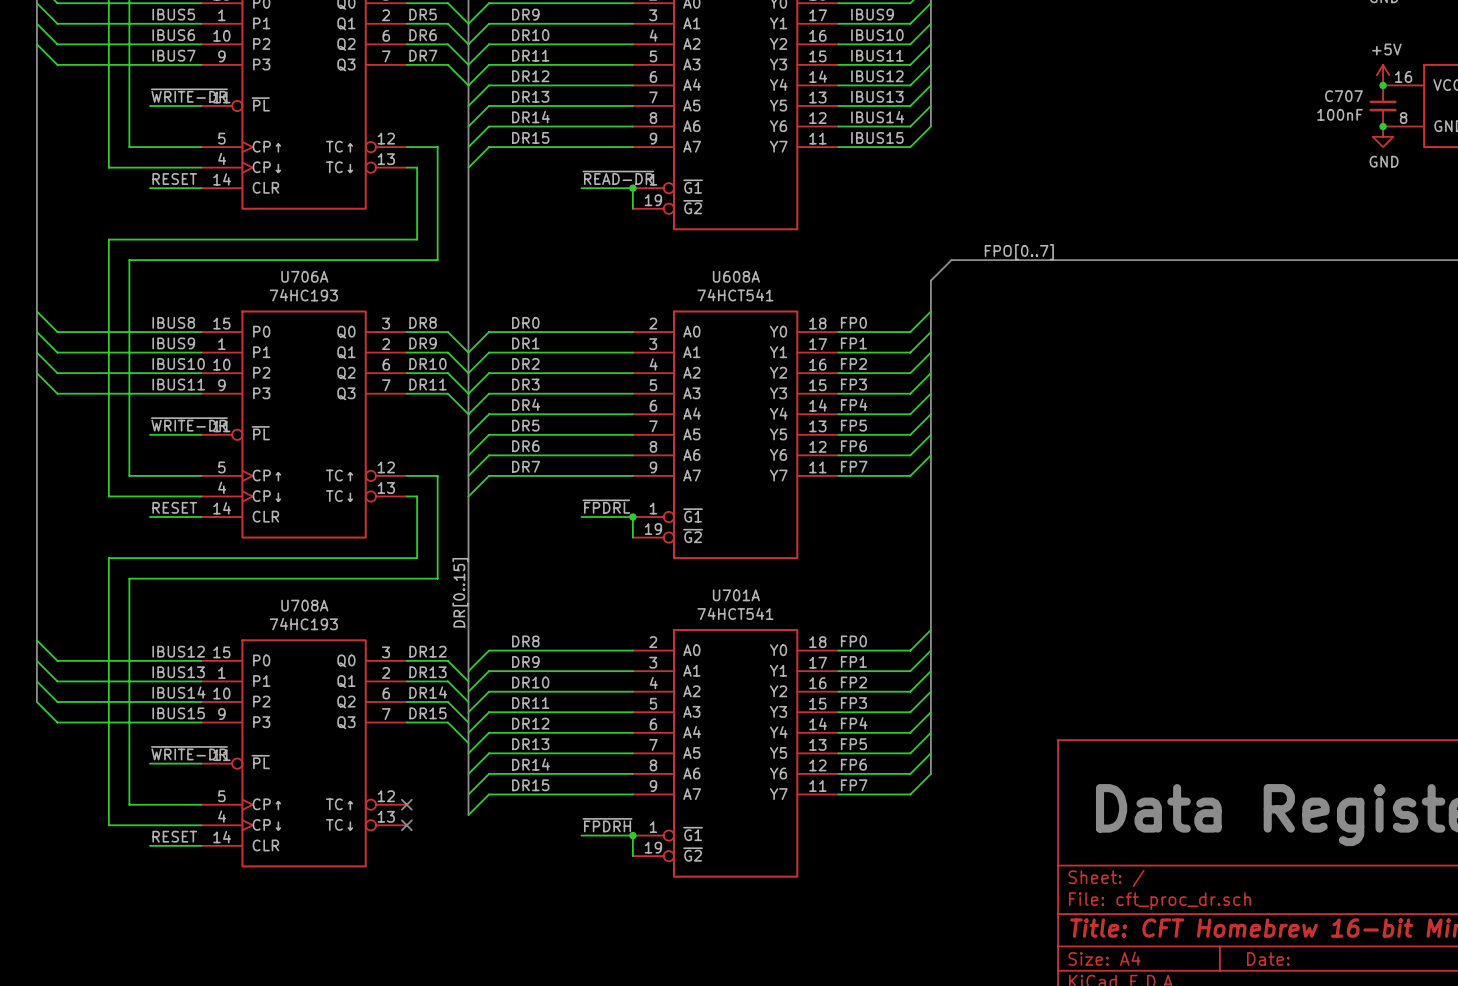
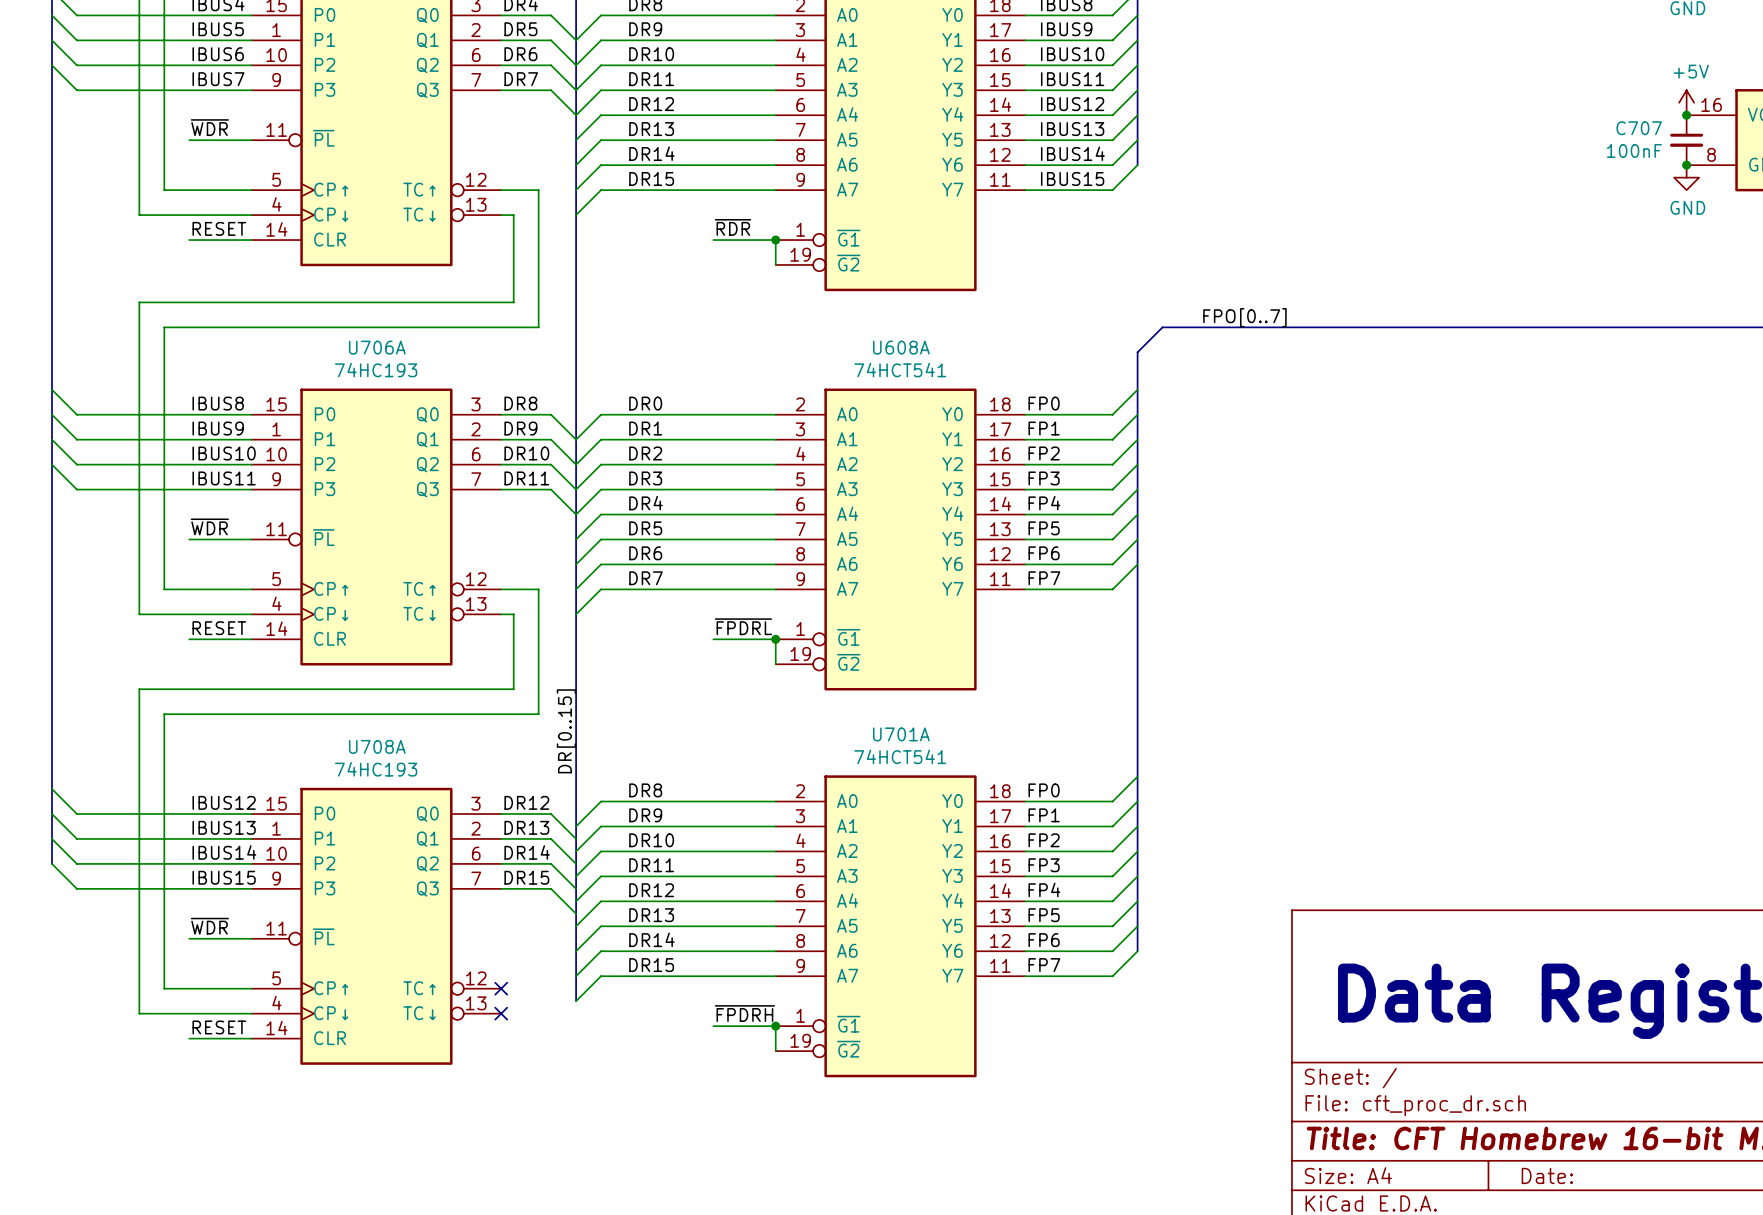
label: ~{WRITE-DR} (189, 95) -> ~{WDR} (209, 127)
label: ~{READ-DR} (618, 177) -> ~{RDR} (733, 227)
label: ~{WRITE-DR} (189, 424) -> ~{WDR} (209, 526)
label: ~{WRITE-DR} (189, 753) -> ~{WDR} (209, 926)

